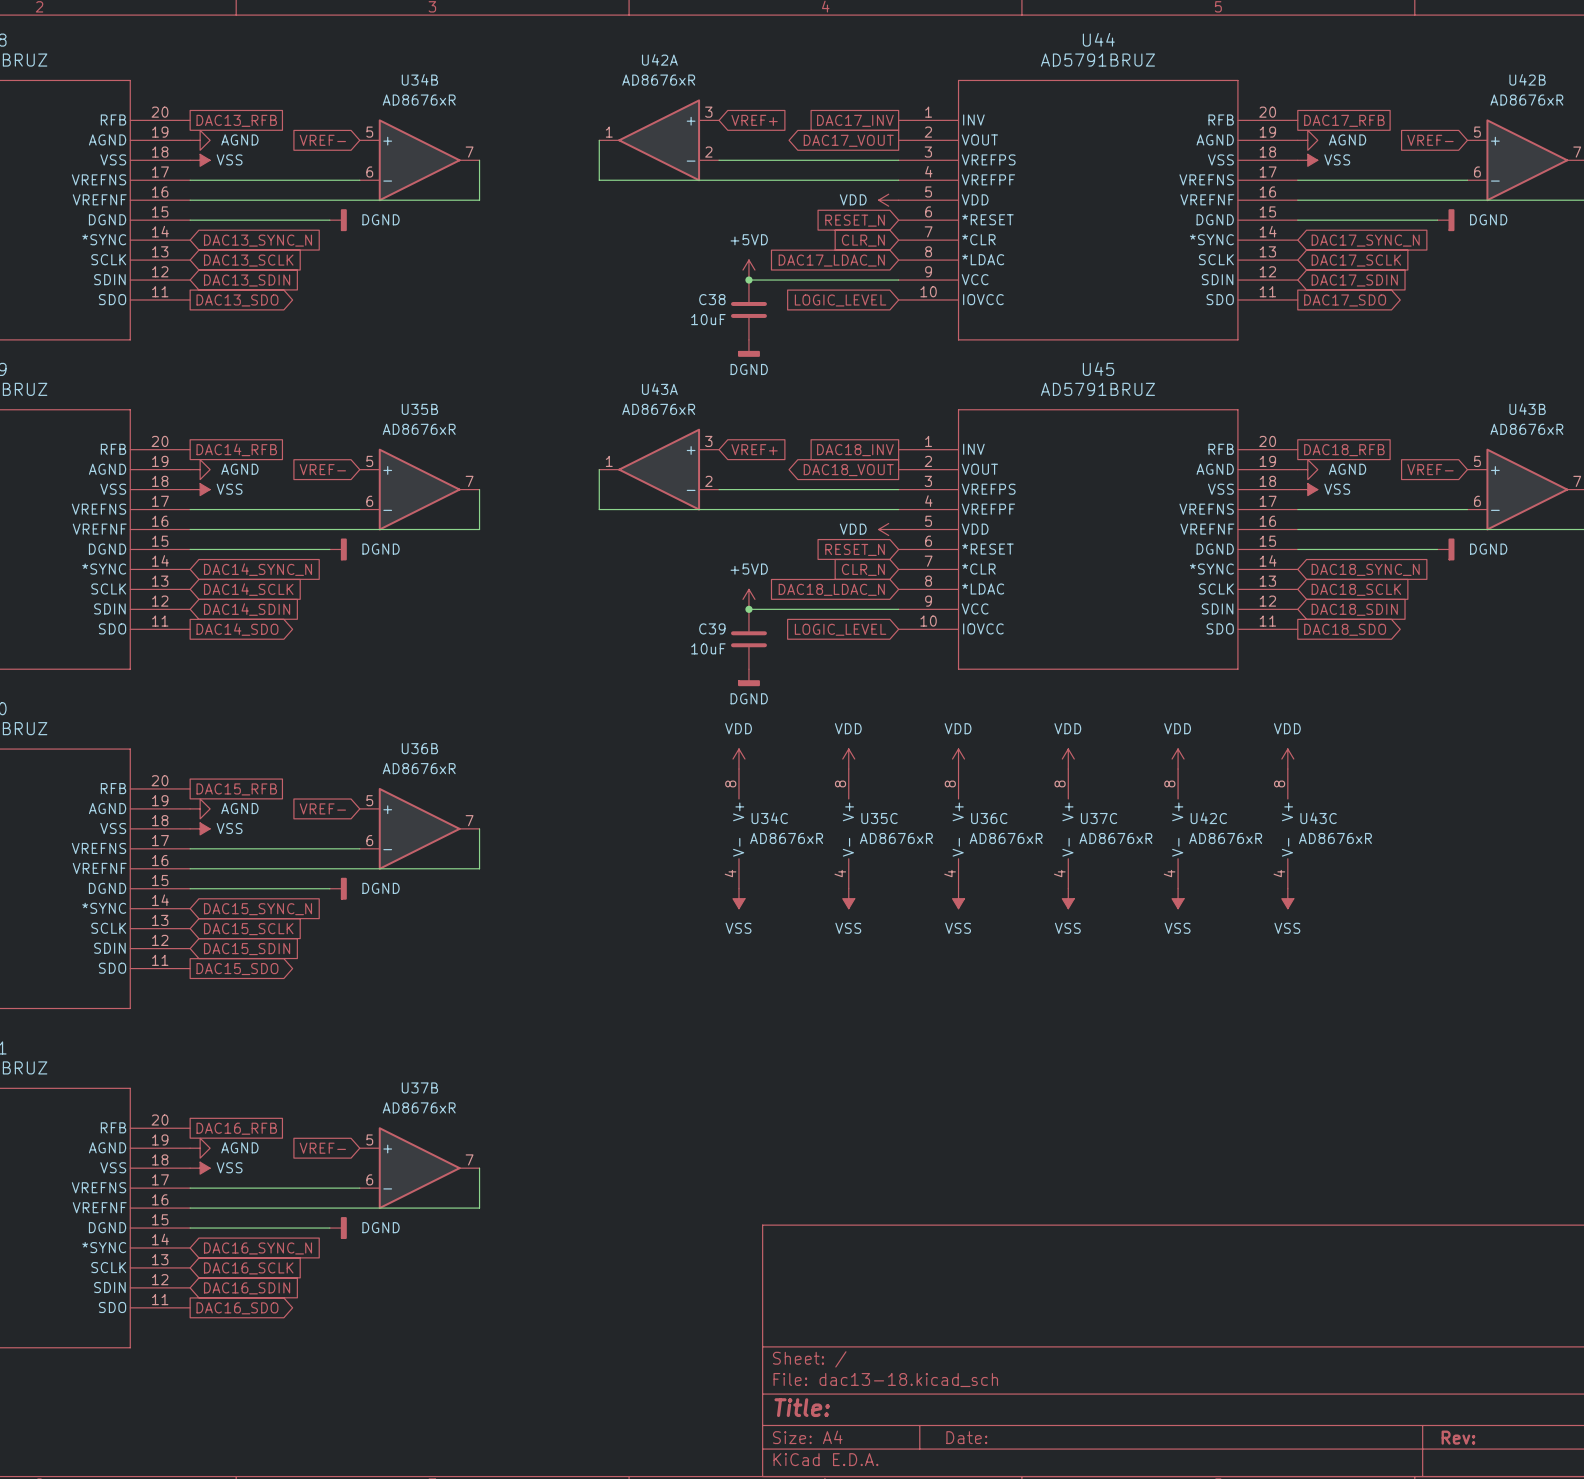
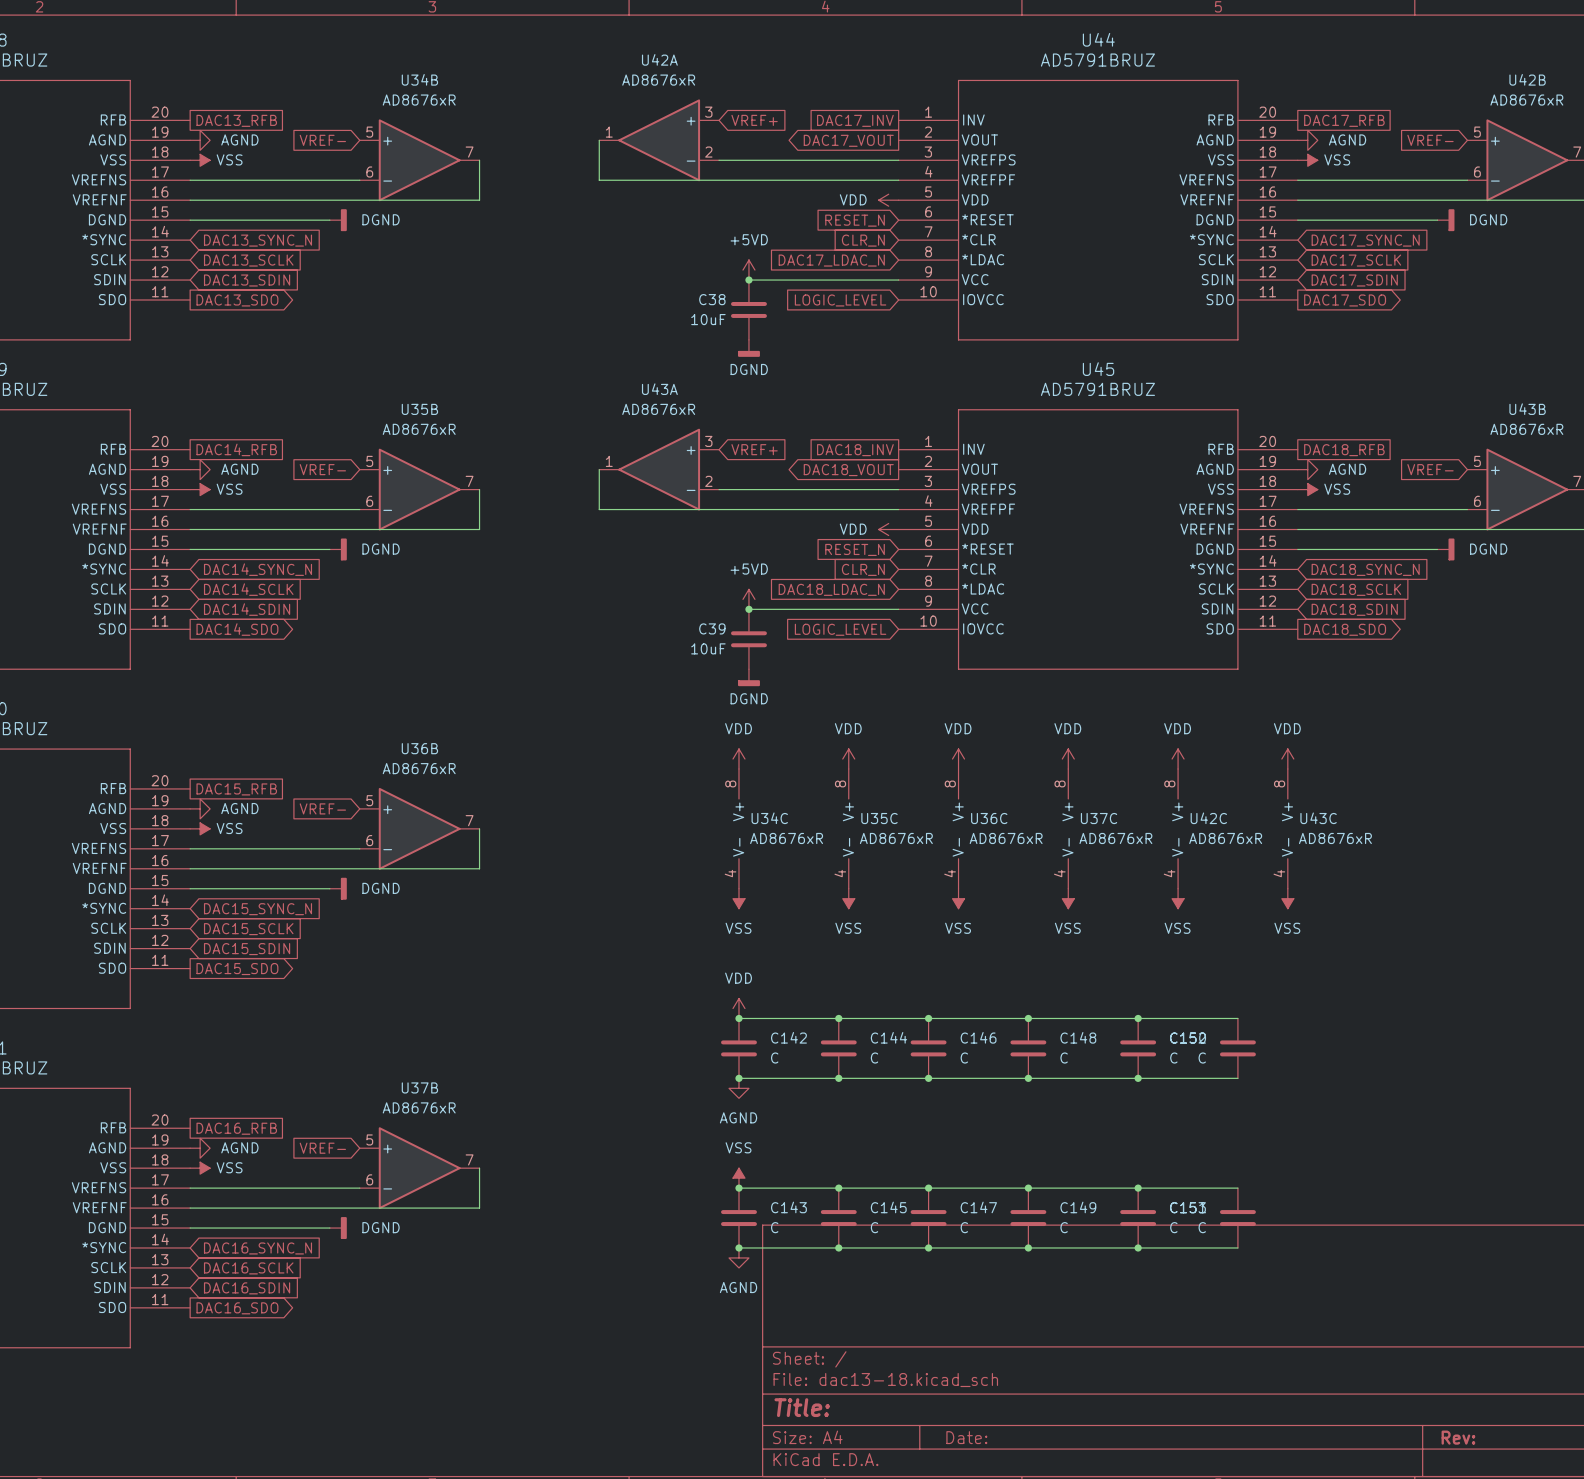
power symbol: none -> VDD (738, 1008)
wire: none -> (738, 1018) (1237, 1018)
junction: none -> (738, 1018)
junction: none -> (838, 1018)
junction: none -> (928, 1018)
junction: none -> (1028, 1018)
junction: none -> (1138, 1018)
C142: none -> C (738, 1048)
C144: none -> C (838, 1048)
C146: none -> C (928, 1048)
C148: none -> C (1028, 1048)
part: none -> C (1138, 1048)
part: none -> C (1237, 1048)
wire: none -> (738, 1078) (1237, 1078)
junction: none -> (738, 1078)
junction: none -> (838, 1078)
junction: none -> (928, 1078)
junction: none -> (1028, 1078)
junction: none -> (1138, 1078)
power symbol: none -> AGND (738, 1088)
power symbol: none -> VSS (738, 1178)
wire: none -> (738, 1188) (1237, 1188)
junction: none -> (738, 1188)
junction: none -> (838, 1188)
junction: none -> (928, 1188)
junction: none -> (1028, 1188)
junction: none -> (1138, 1188)
C143: none -> C (738, 1218)
C145: none -> C (838, 1218)
C147: none -> C (928, 1218)
C149: none -> C (1028, 1218)
part: none -> C (1138, 1218)
part: none -> C (1237, 1218)
wire: none -> (738, 1247) (1237, 1247)
junction: none -> (738, 1247)
junction: none -> (838, 1247)
junction: none -> (928, 1247)
junction: none -> (1028, 1247)
junction: none -> (1138, 1247)
power symbol: none -> AGND (738, 1257)

